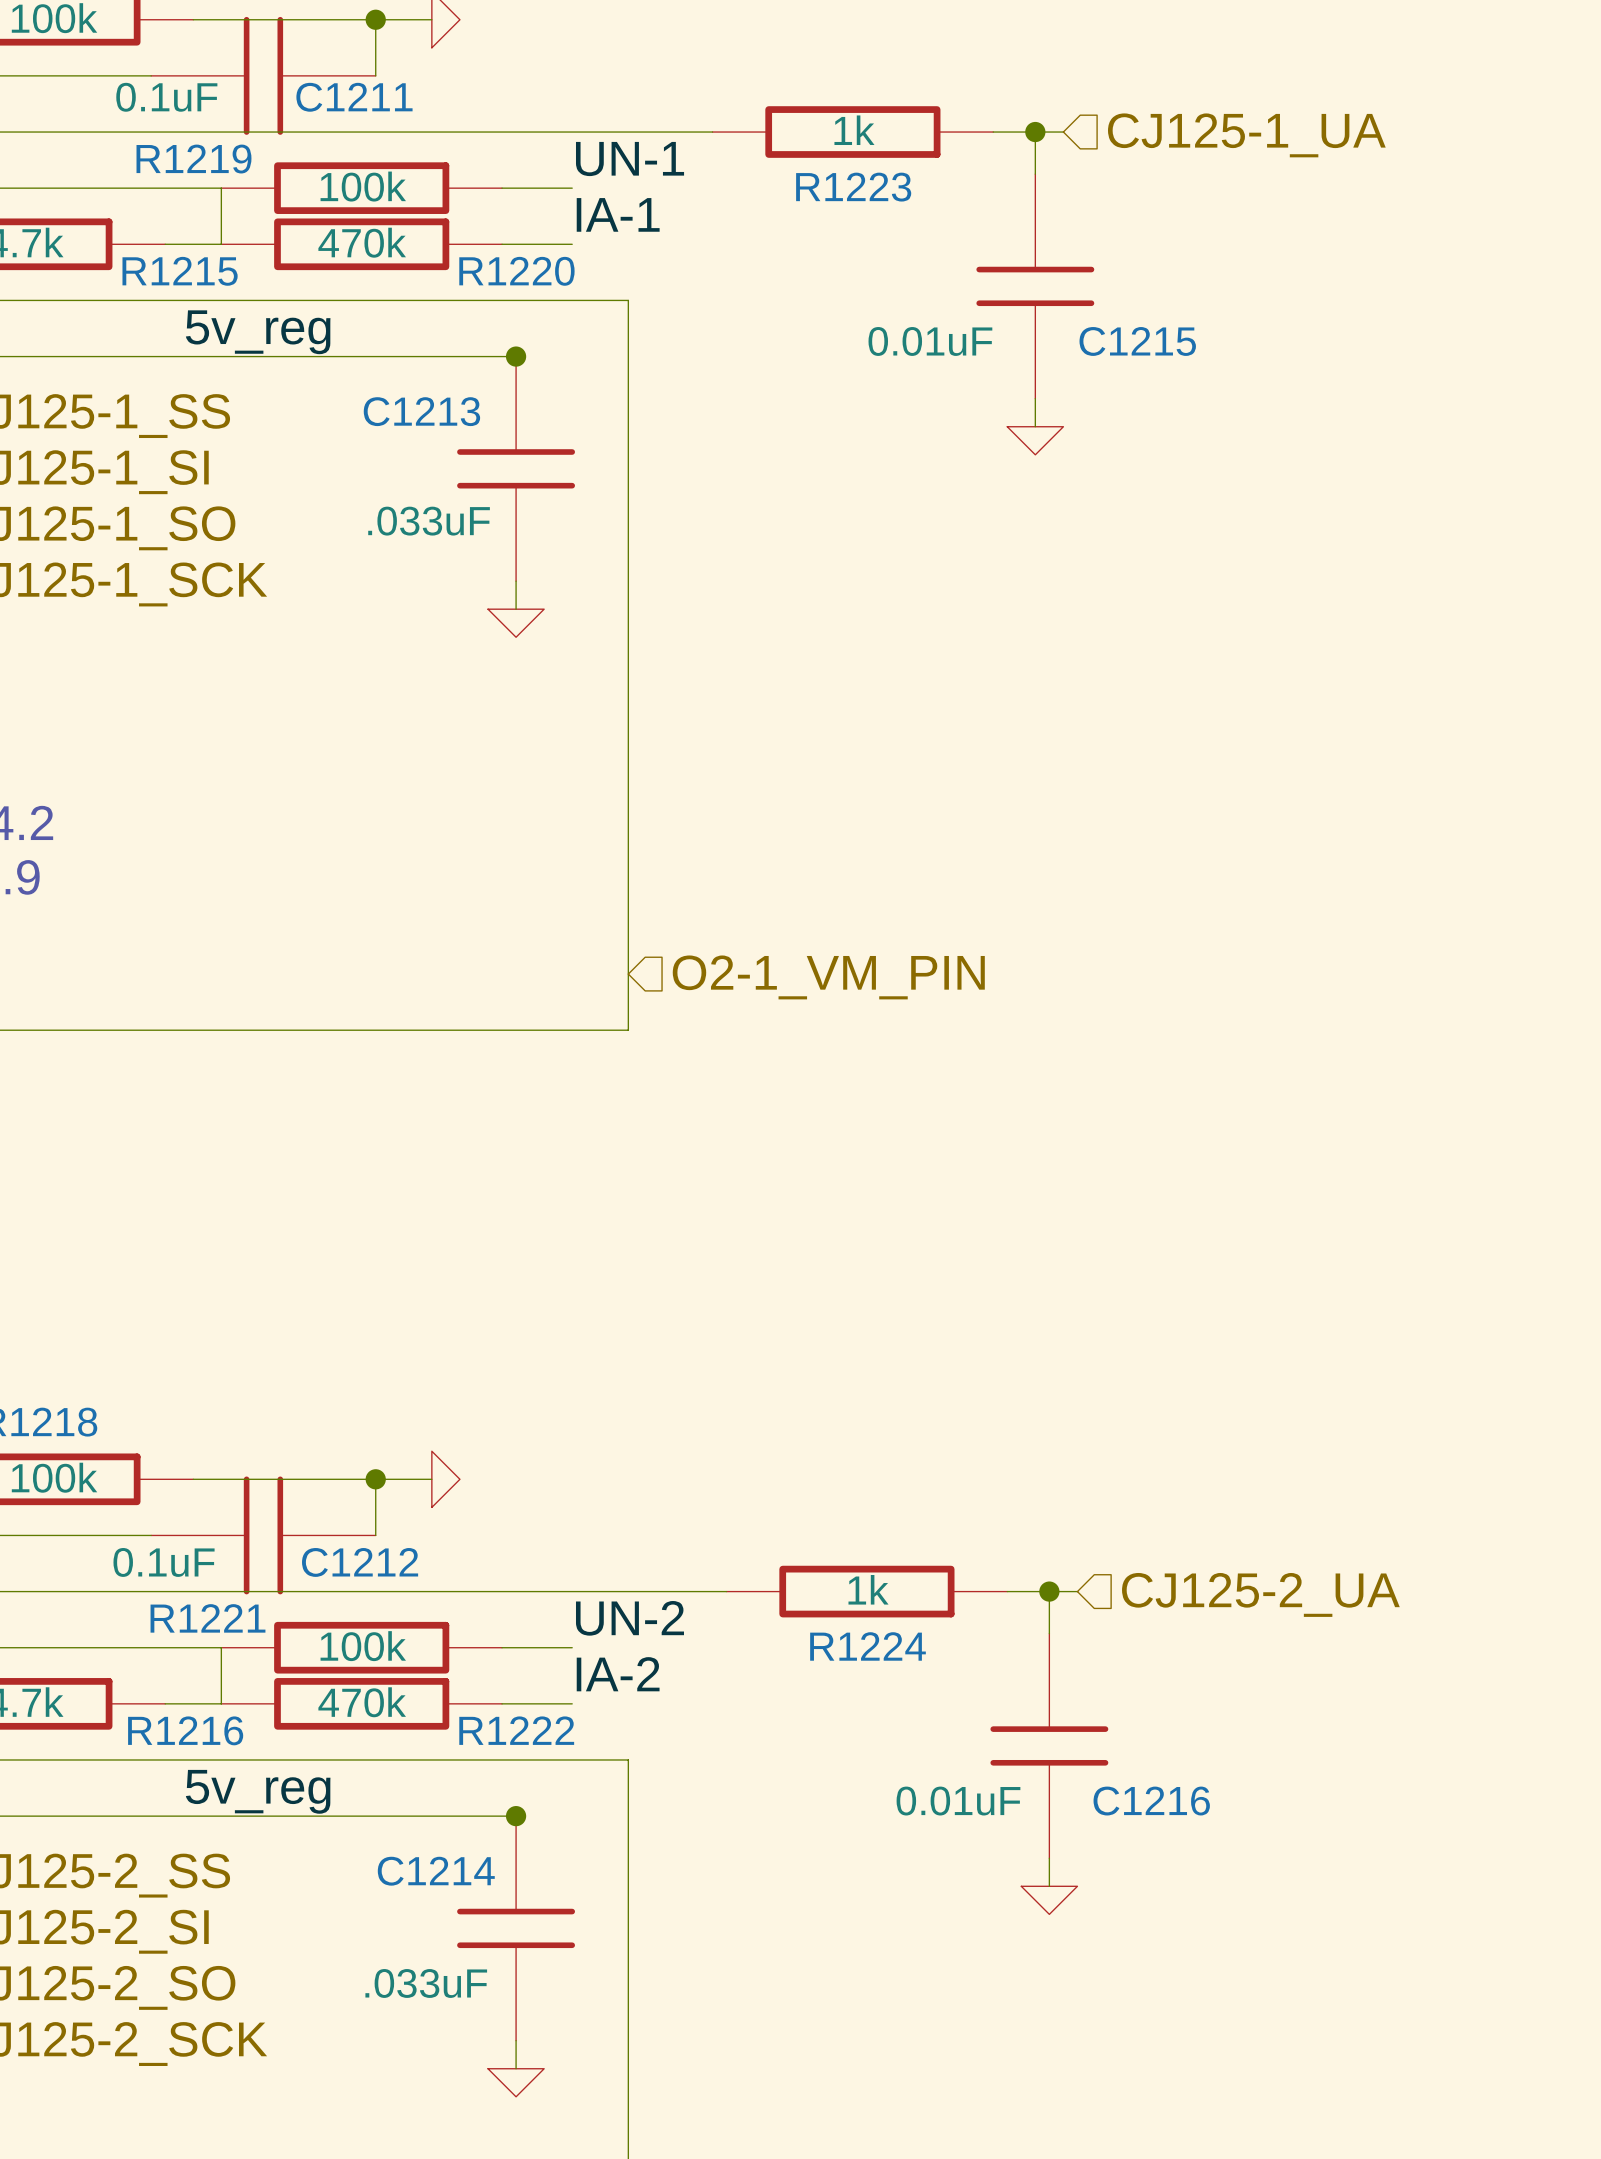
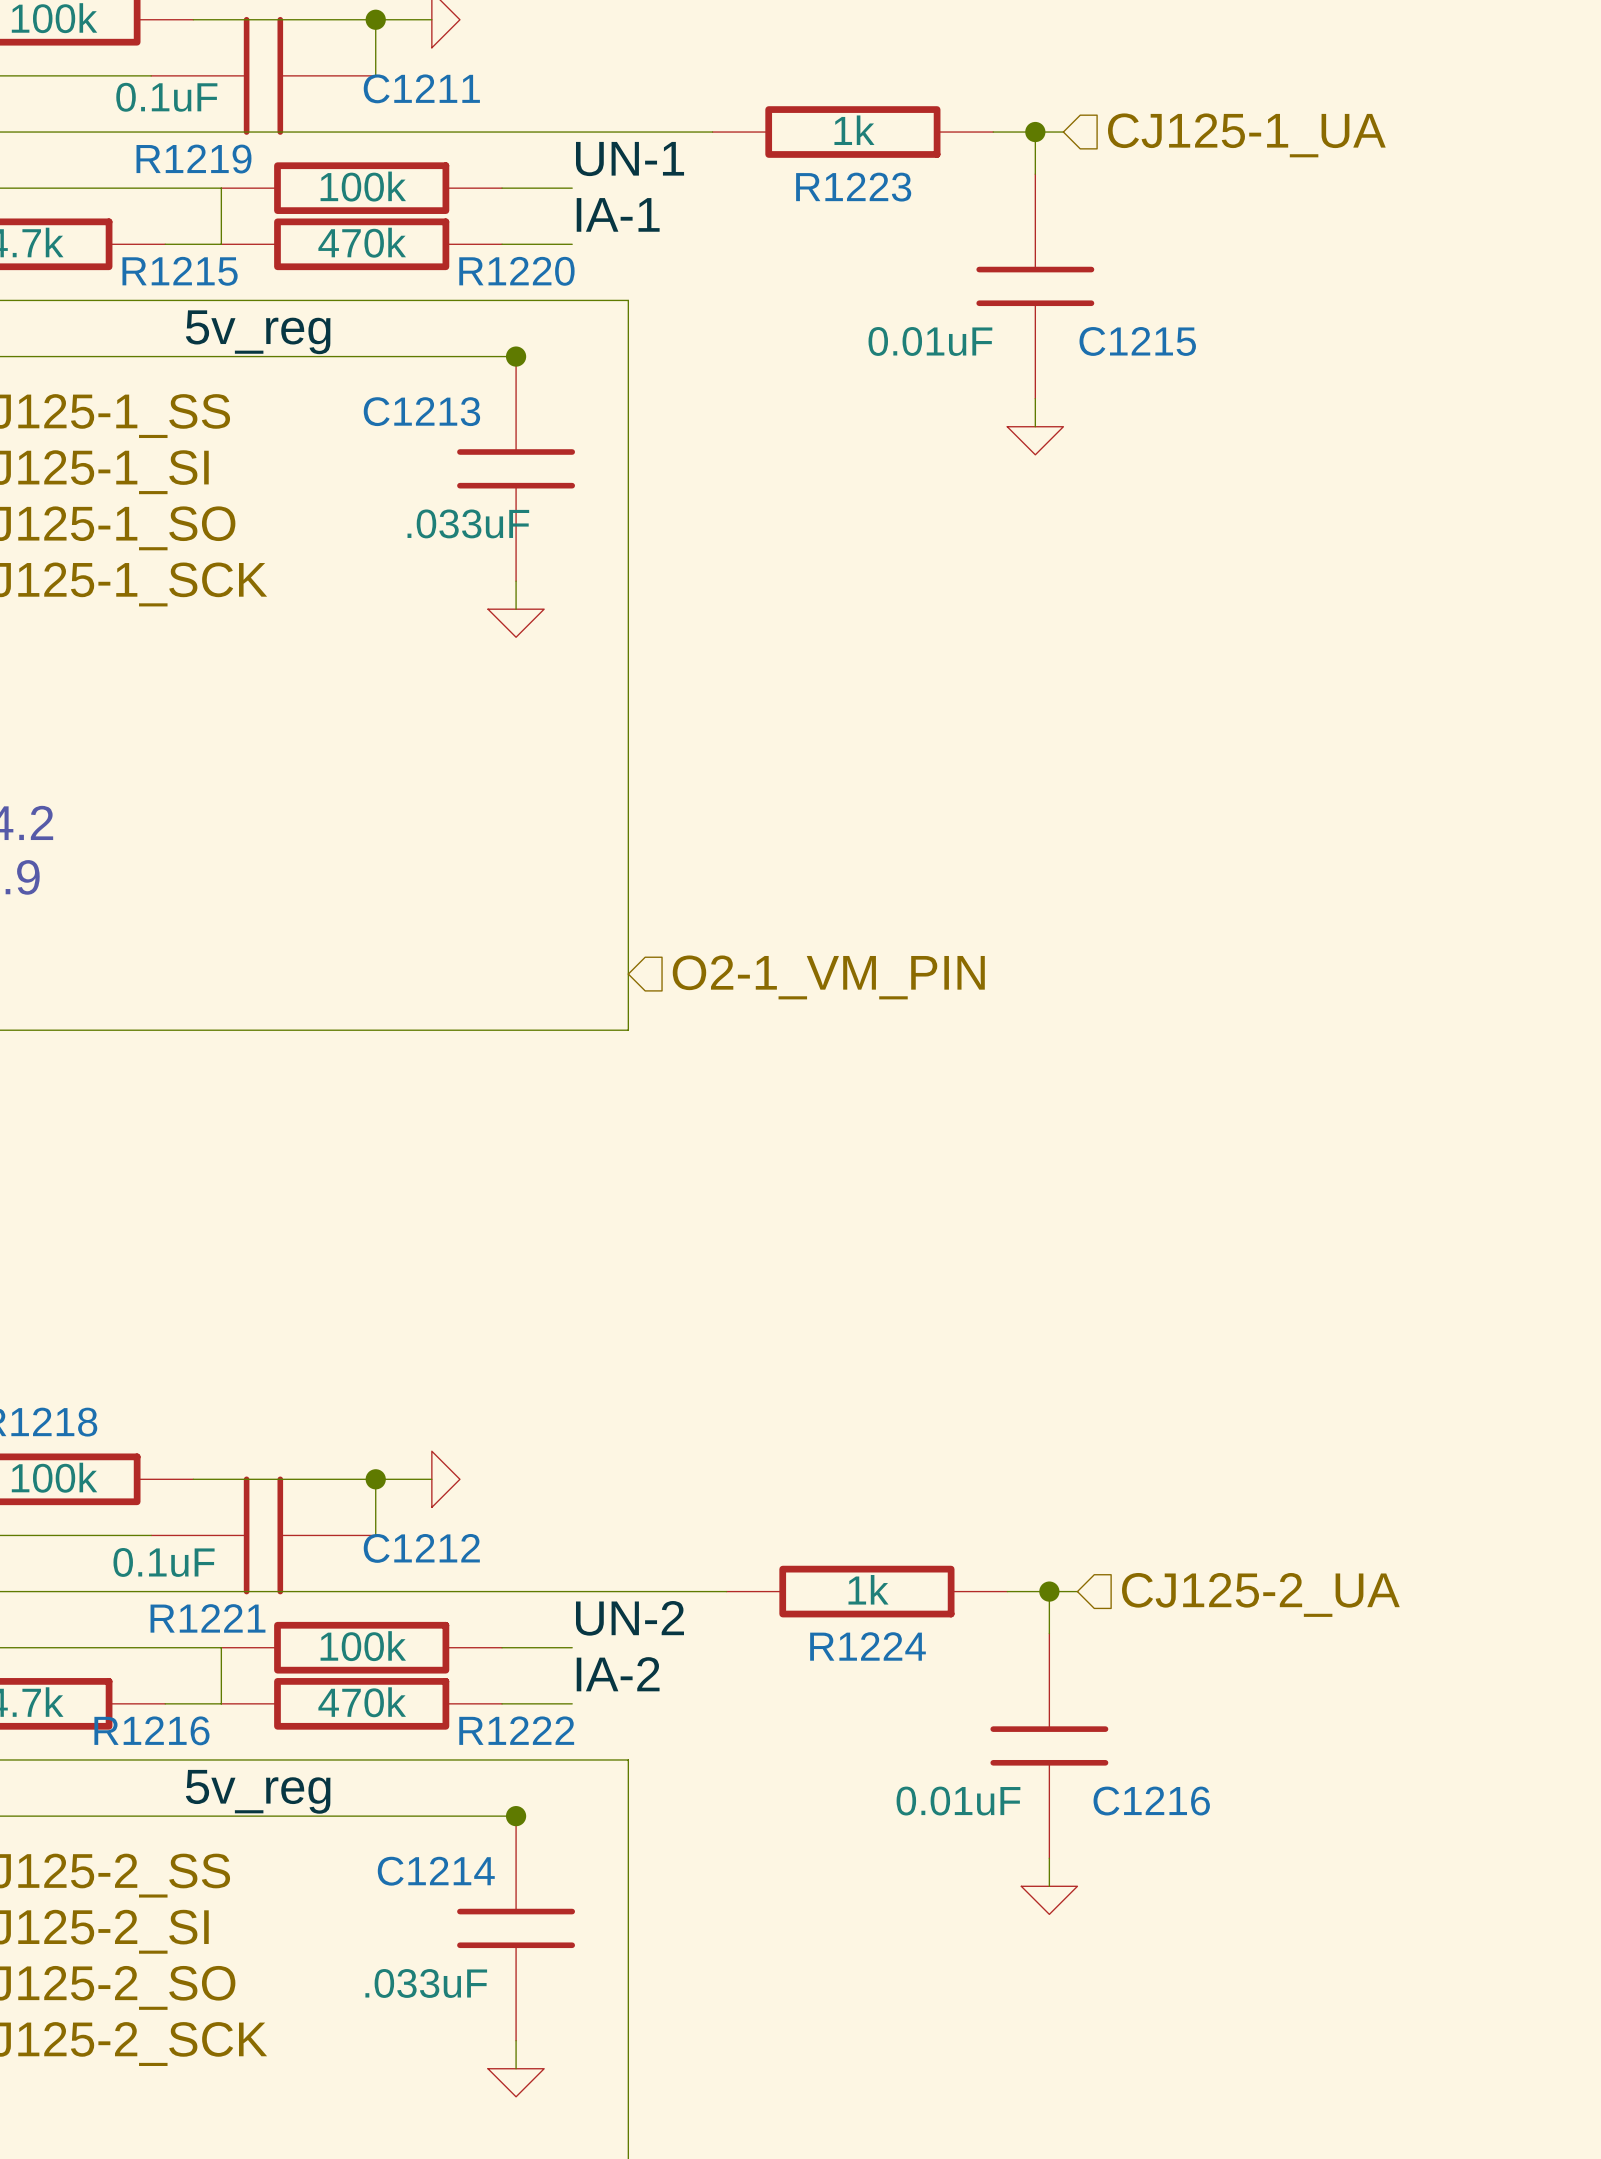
C1211 name position: C1211 (354, 97) -> C1211 (421, 88)
C1213 value position: .033uF (429, 521) -> .033uF (468, 523)
C1212 name position: C1212 (360, 1562) -> C1212 (421, 1548)
R1216 name position: R1216 (185, 1730) -> R1216 (151, 1730)

